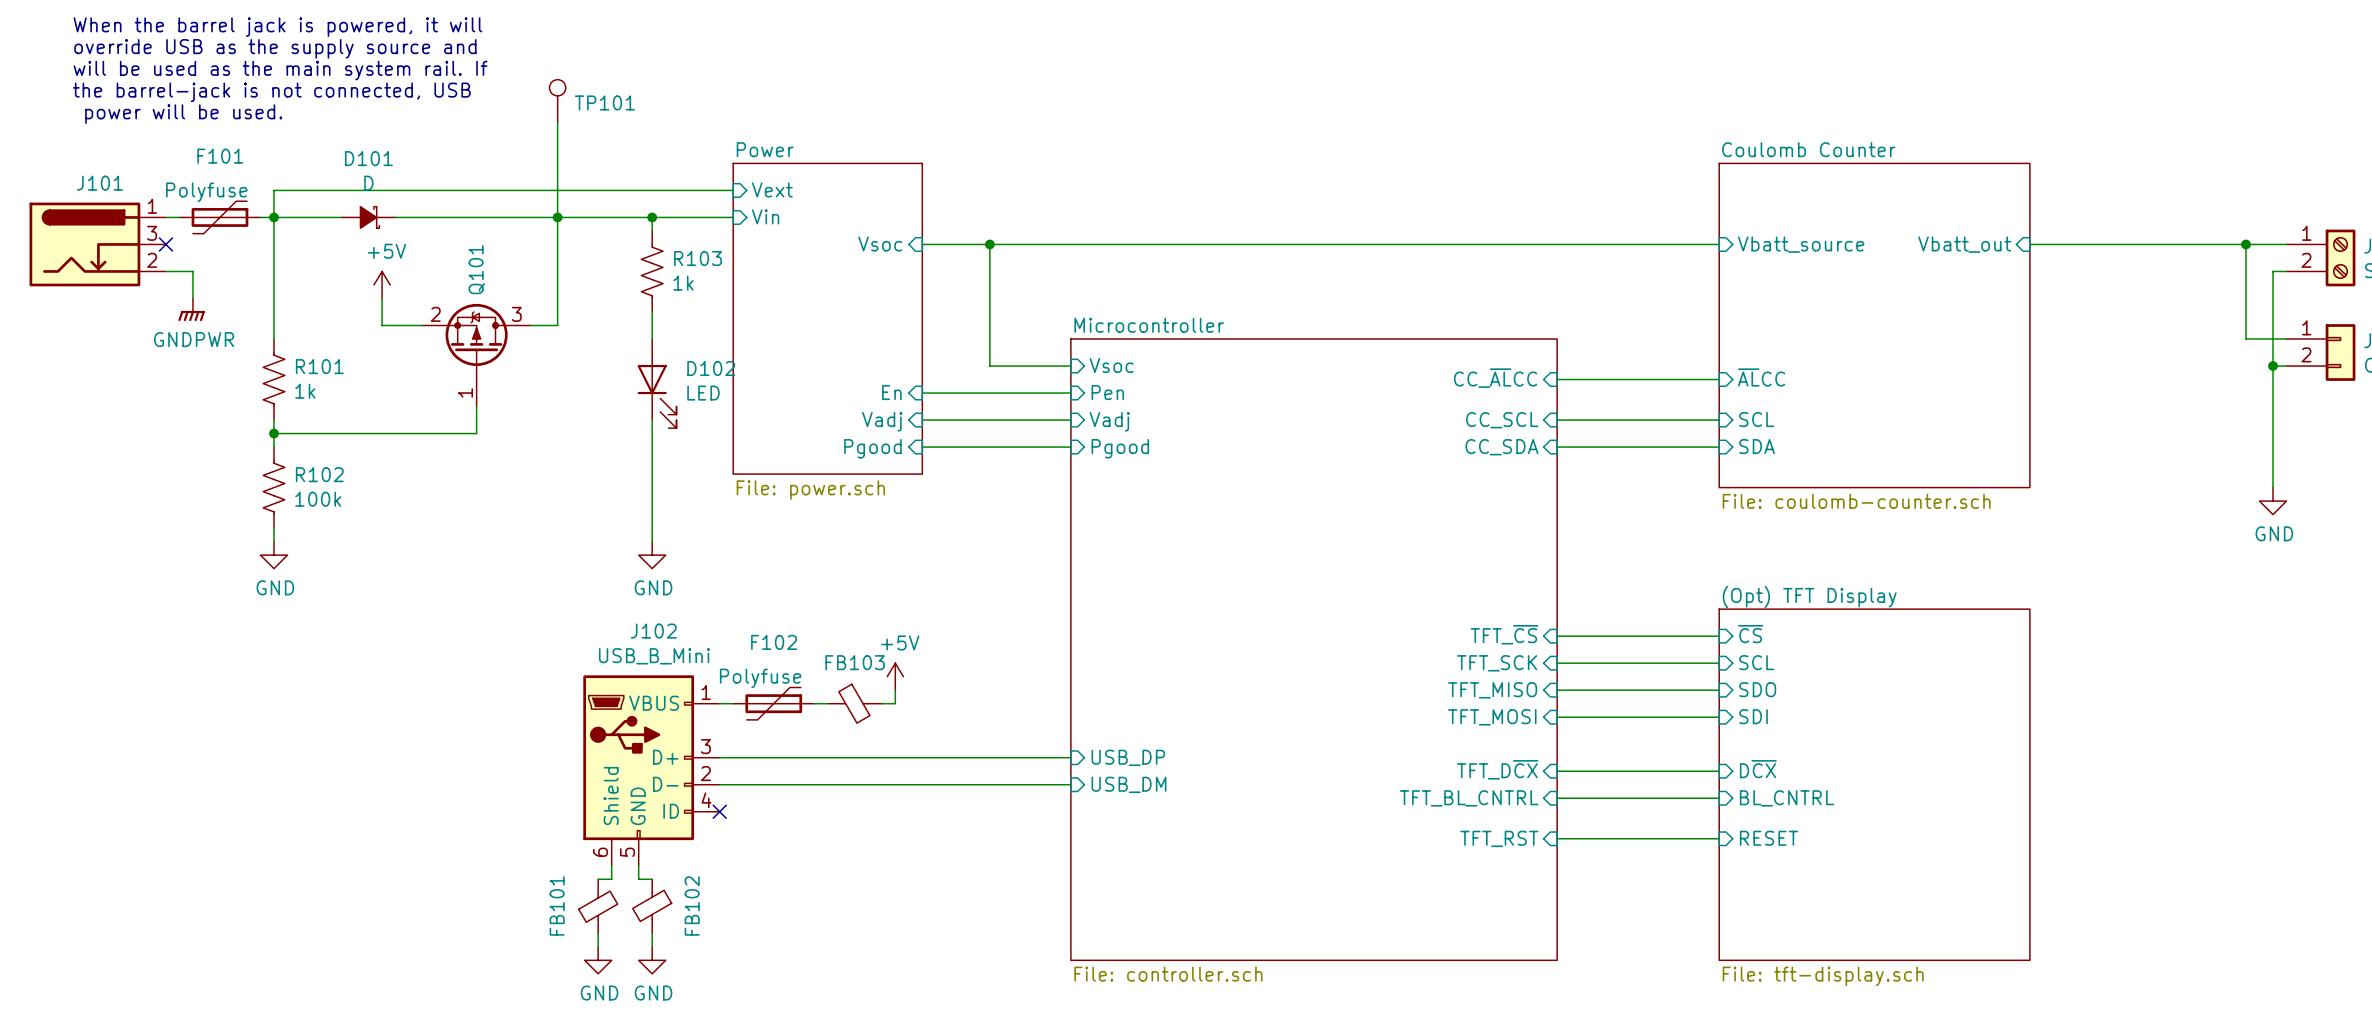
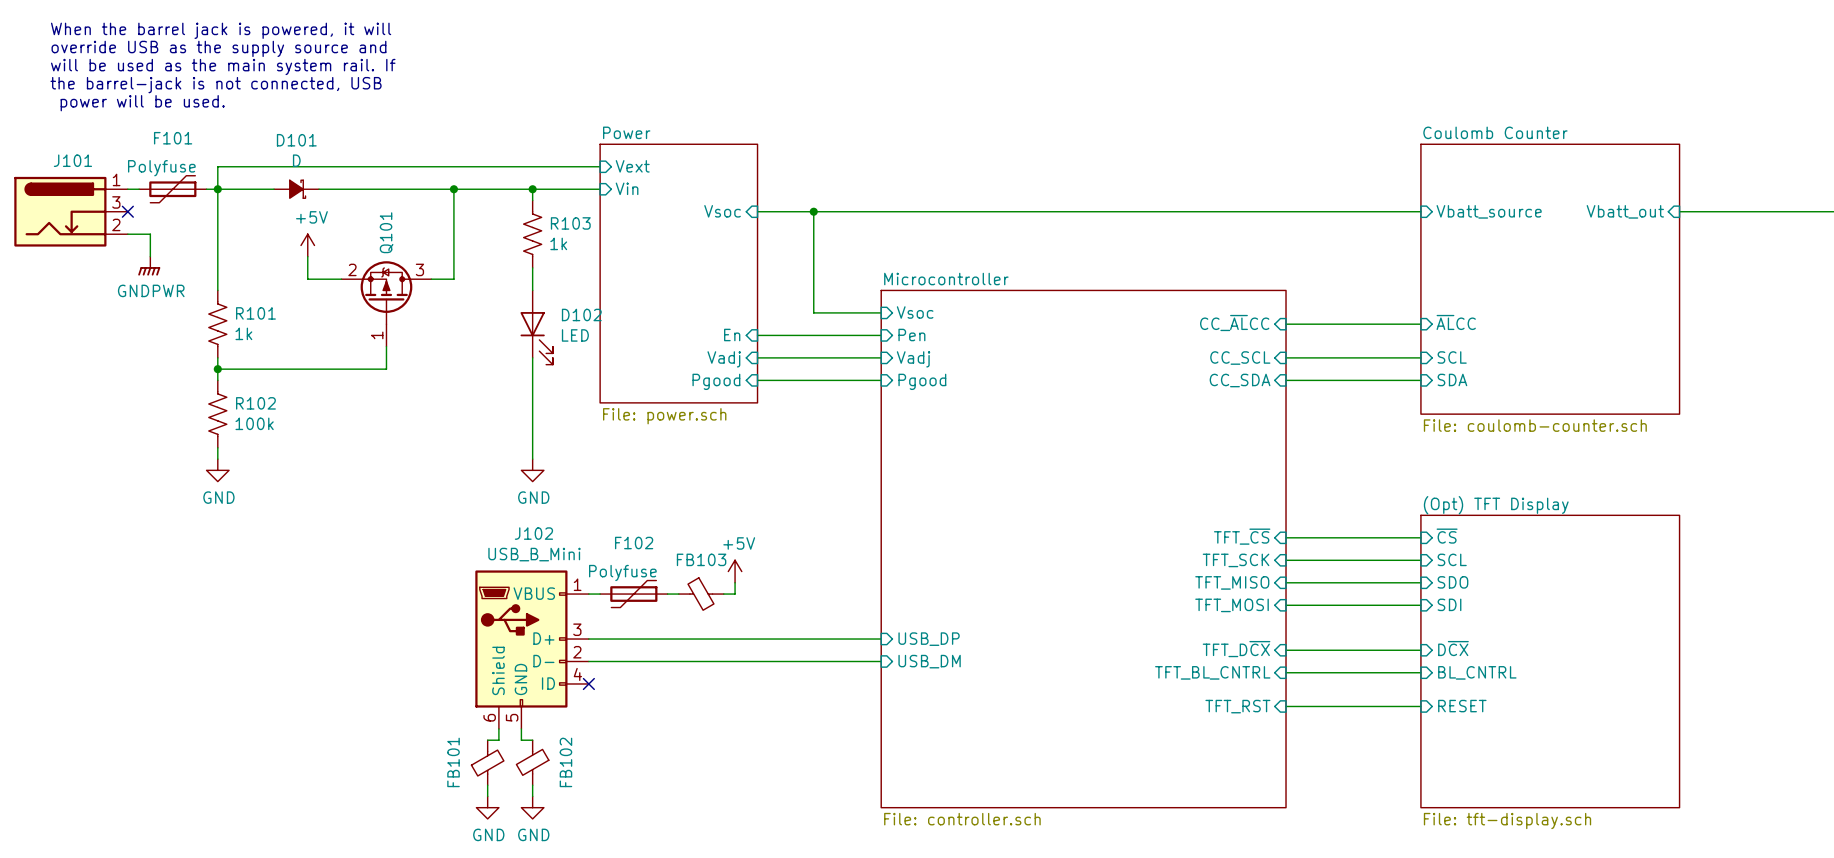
TP101: (557, 101) -> none
wire: (557, 122) (557, 217) -> none

